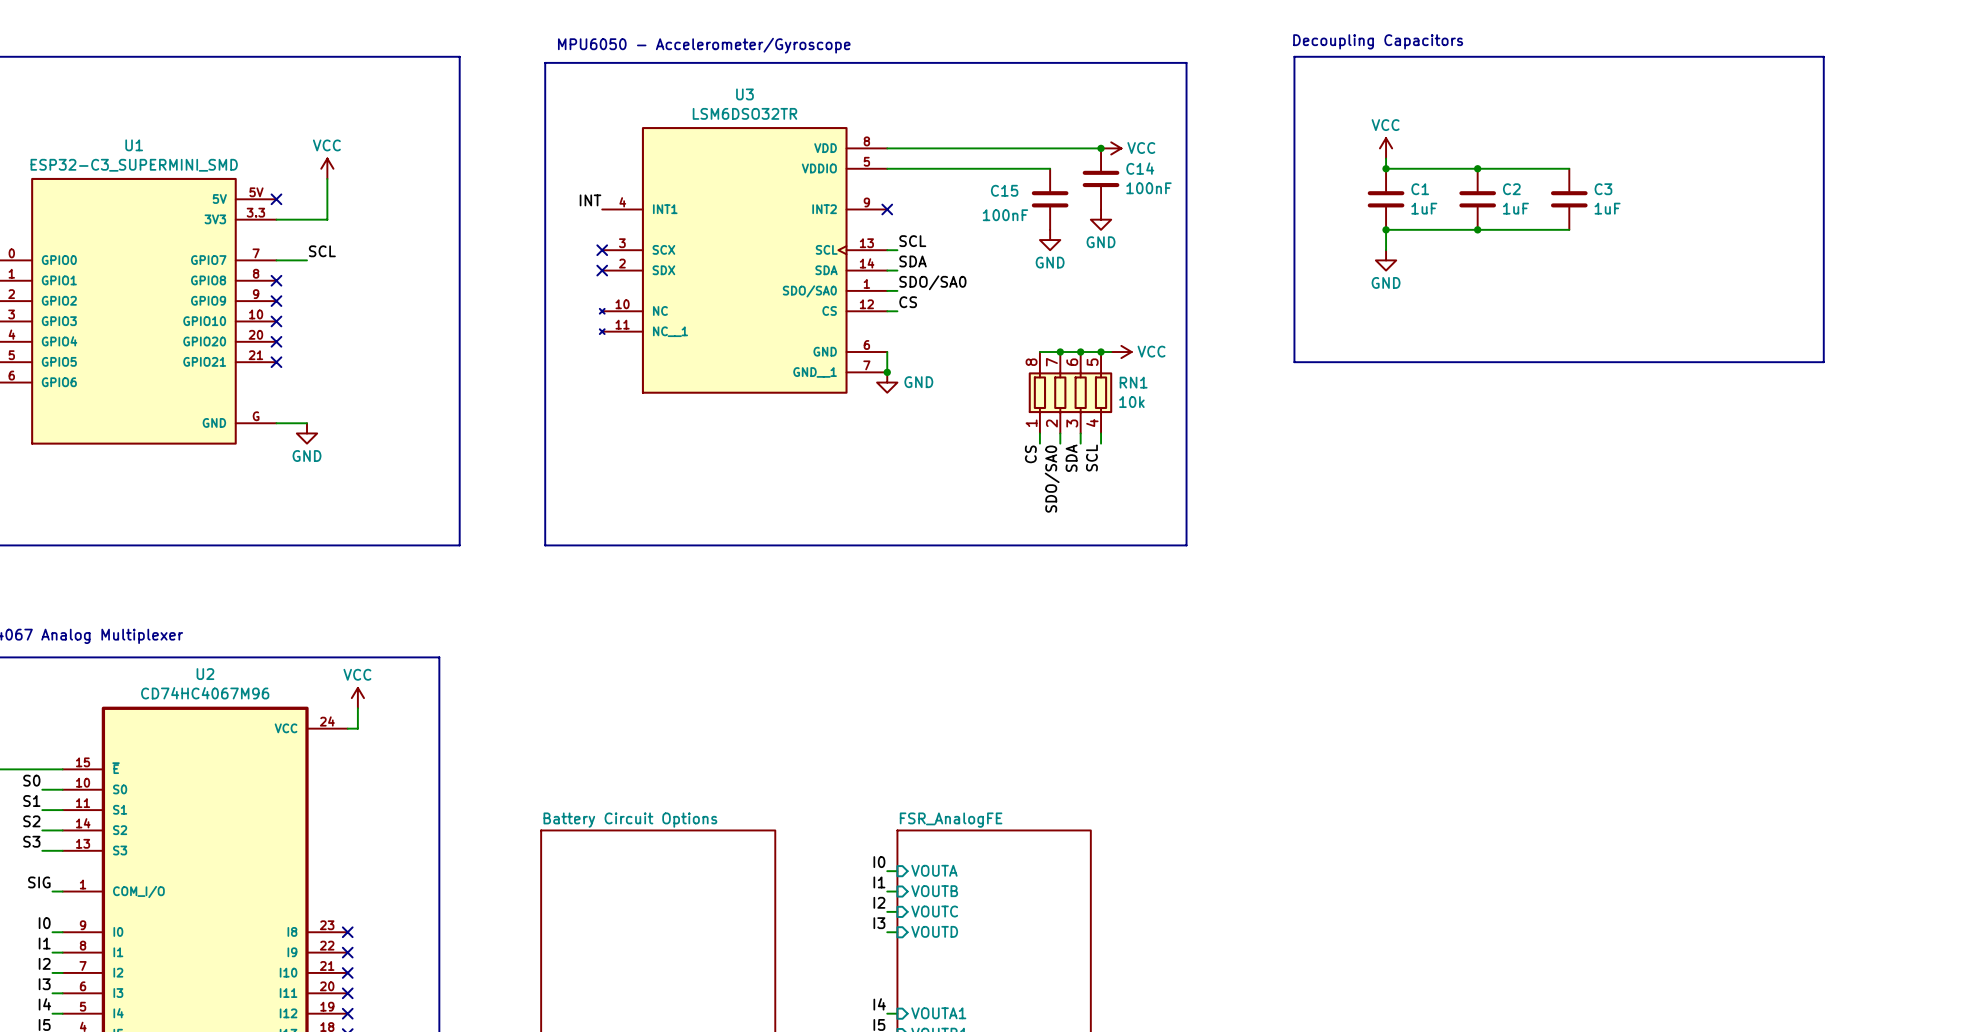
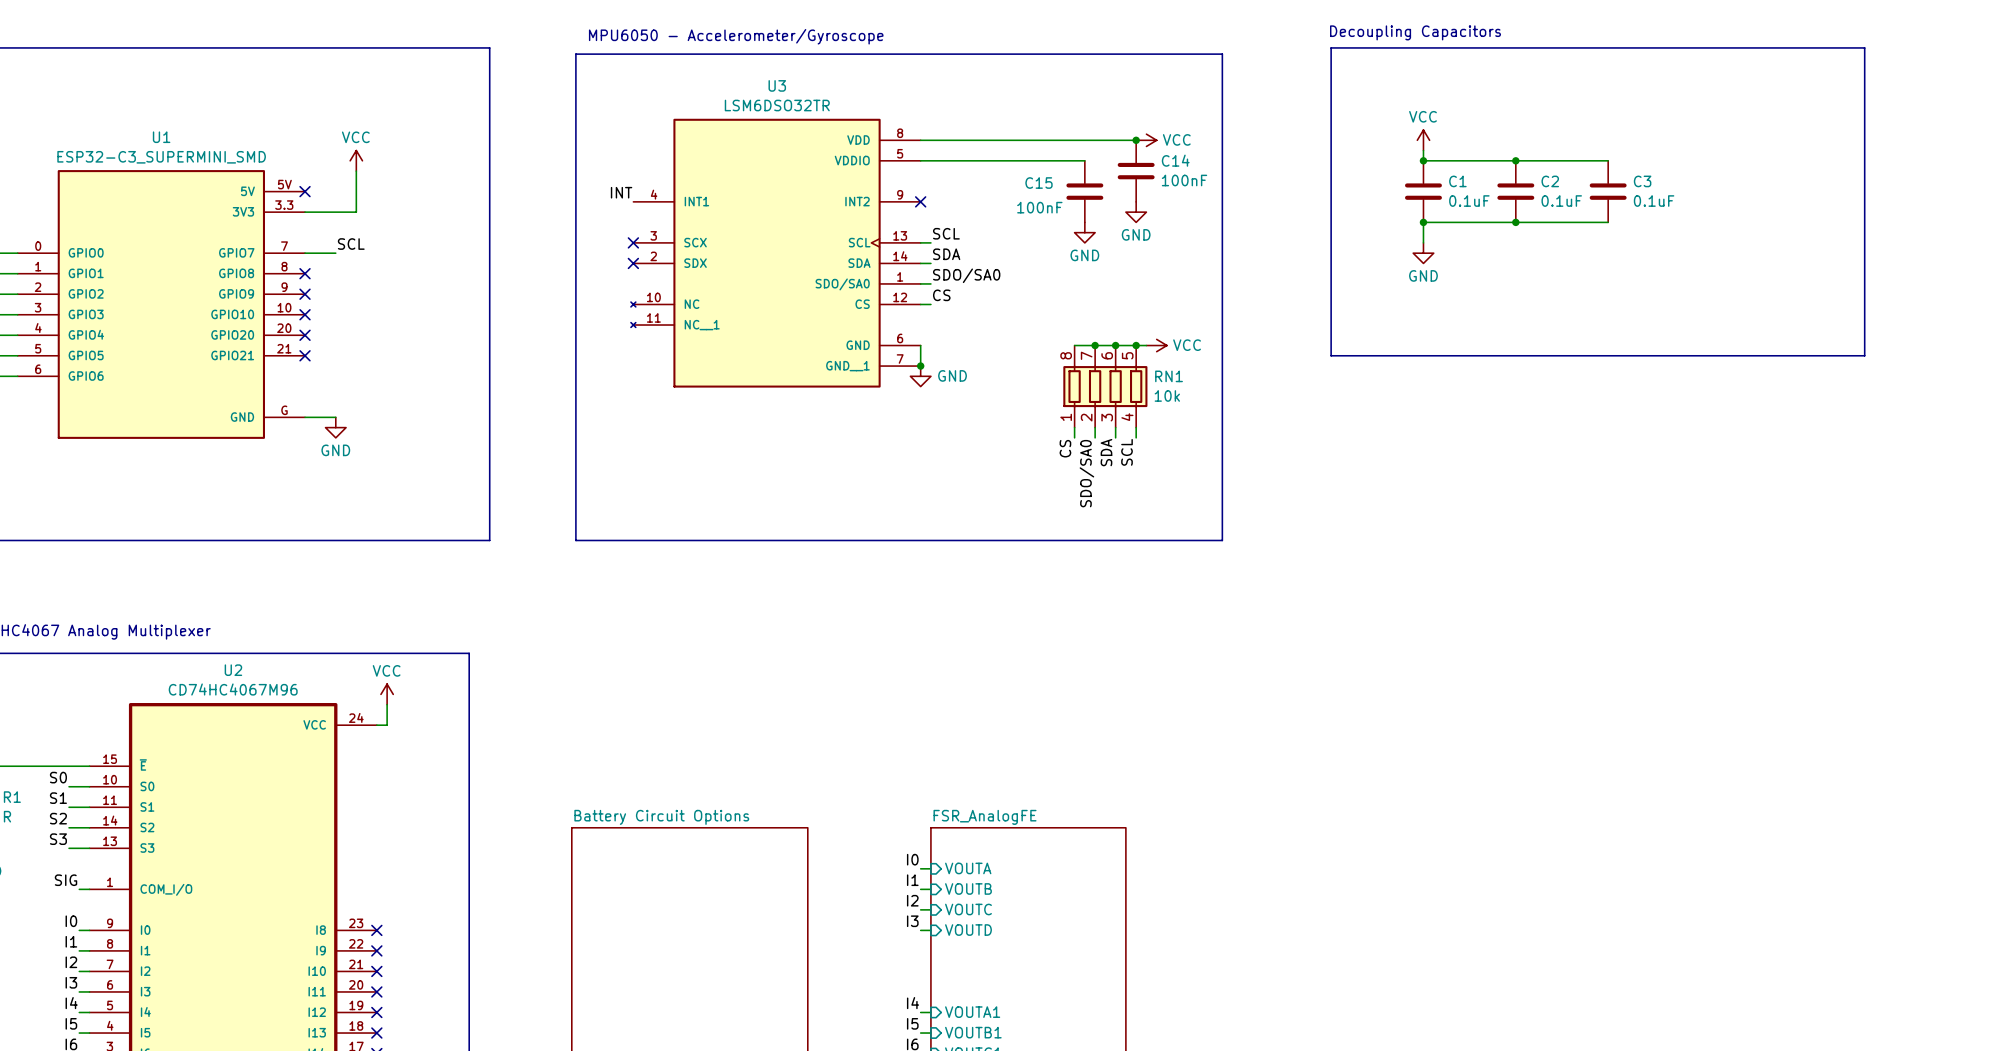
C1 value: 1uF (1424, 208) -> 0.1uF (1469, 201)
C2 value: 1uF (1515, 208) -> 0.1uF (1561, 201)
C3 value: 1uF (1607, 208) -> 0.1uF (1654, 201)

